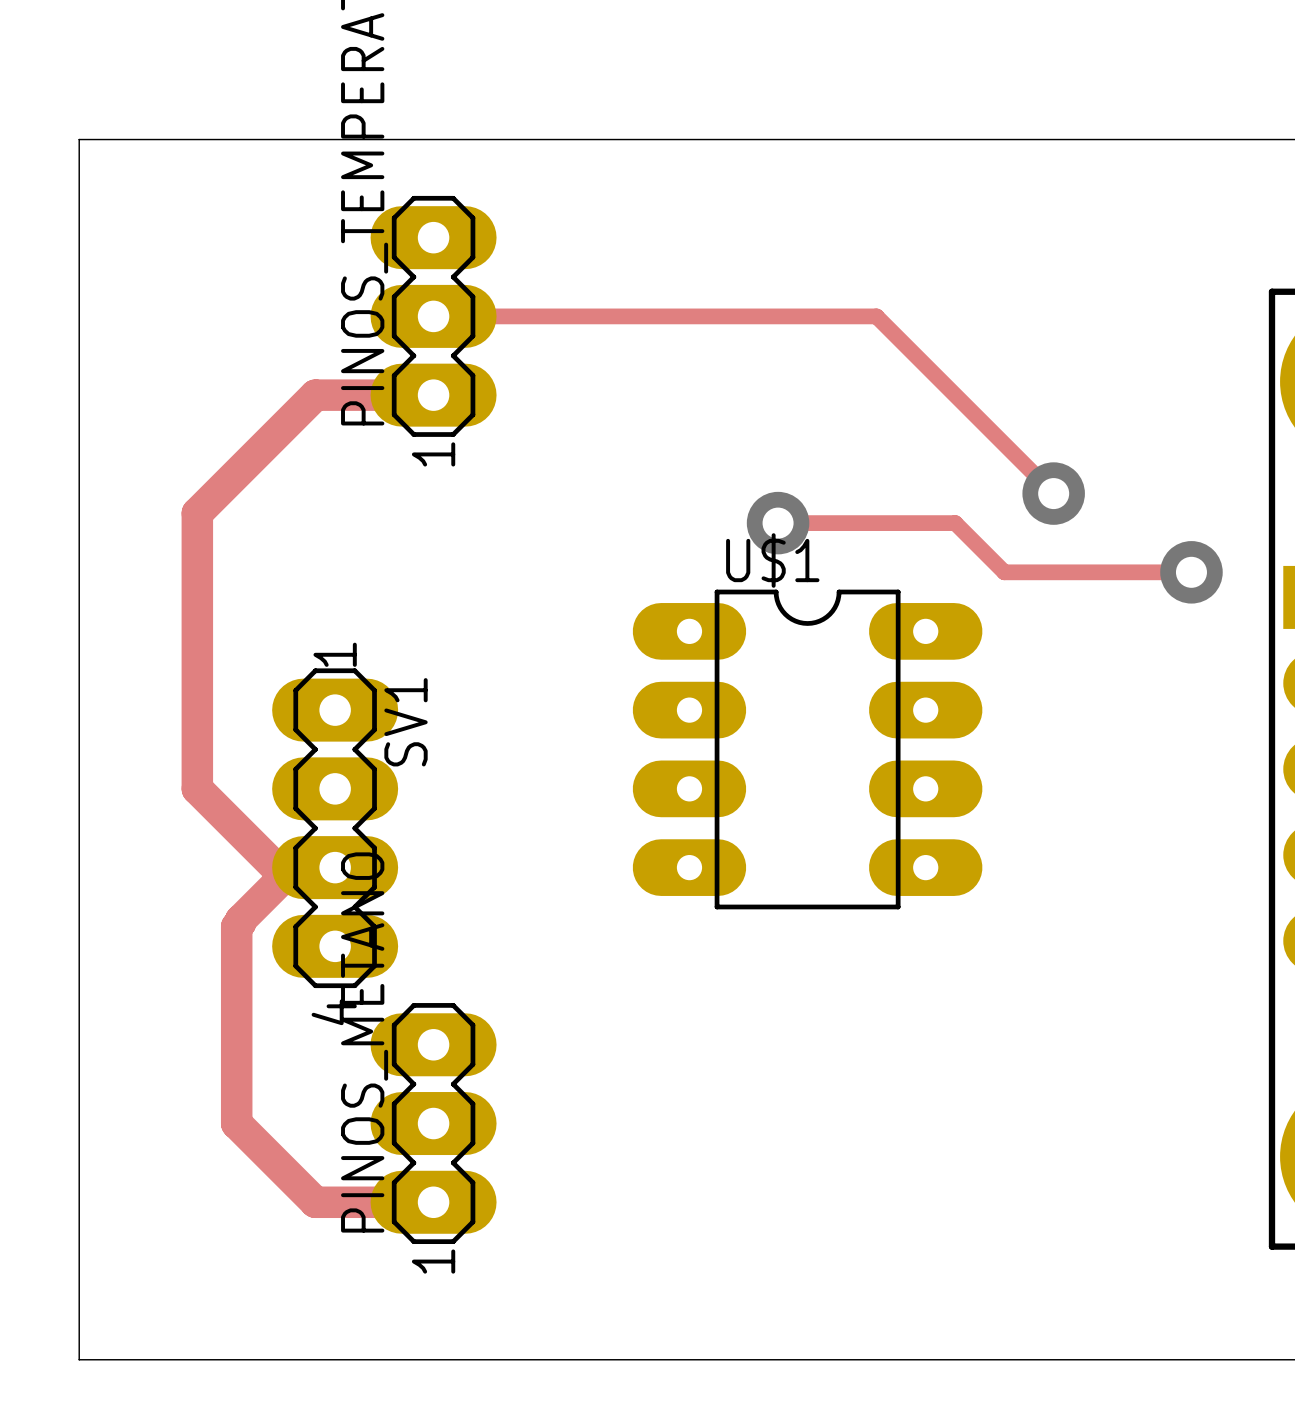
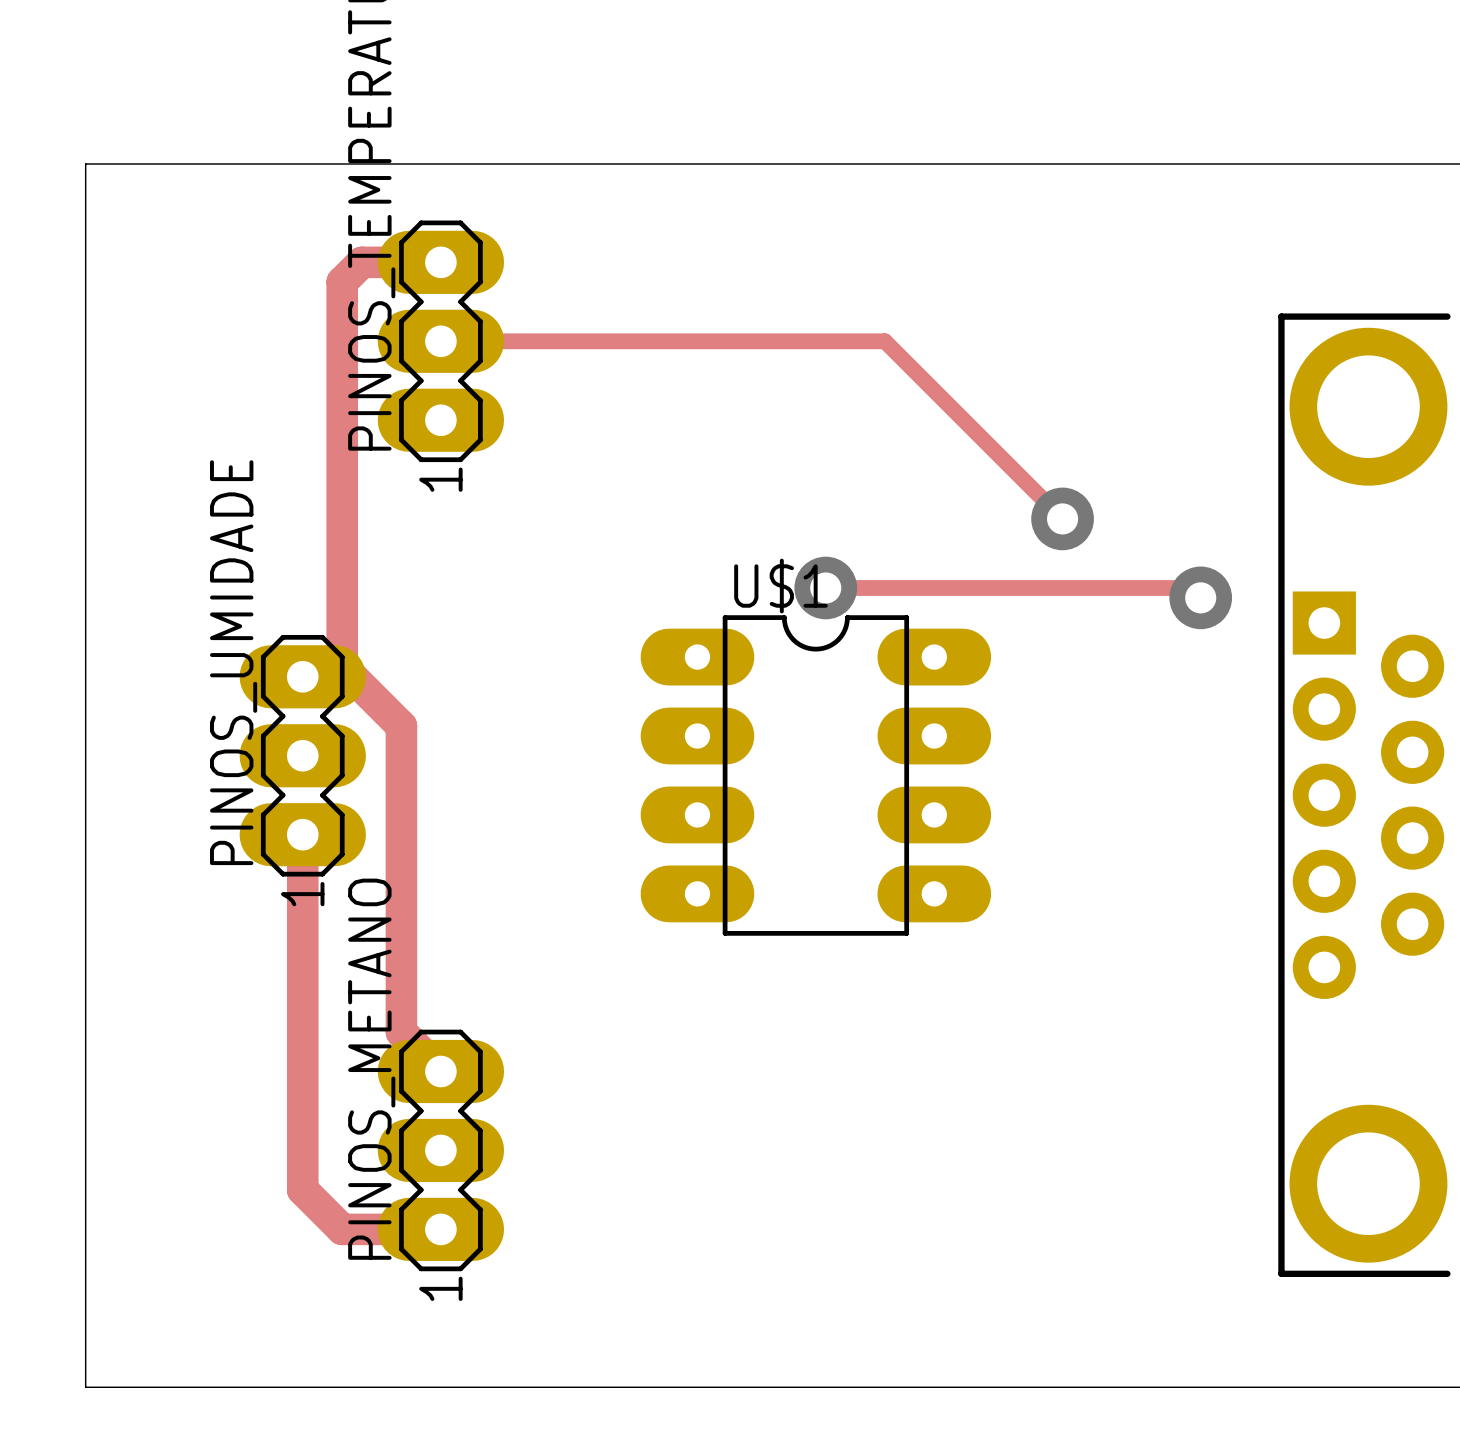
track: none -> (440, 262) (361, 262) (342, 282) (342, 666) (302, 676) (352, 676) (401, 726) (401, 1032) (440, 1071)
track: (433, 395) (315, 395) (197, 513) (197, 788) (276, 867) (335, 867) -> none
track: (778, 523) (955, 523) (1004, 572) (1191, 572) -> (825, 587) (1190, 587) (1200, 597)
via position: (778, 523) -> (825, 587)
PINOS_UMIDADE: none -> (302, 755)
SV1: (335, 828) -> none
track: (293, 867) (240, 920) (236, 926) (236, 1123) (315, 1202) (335, 1202) -> (302, 834) (302, 1189) (342, 1229)

